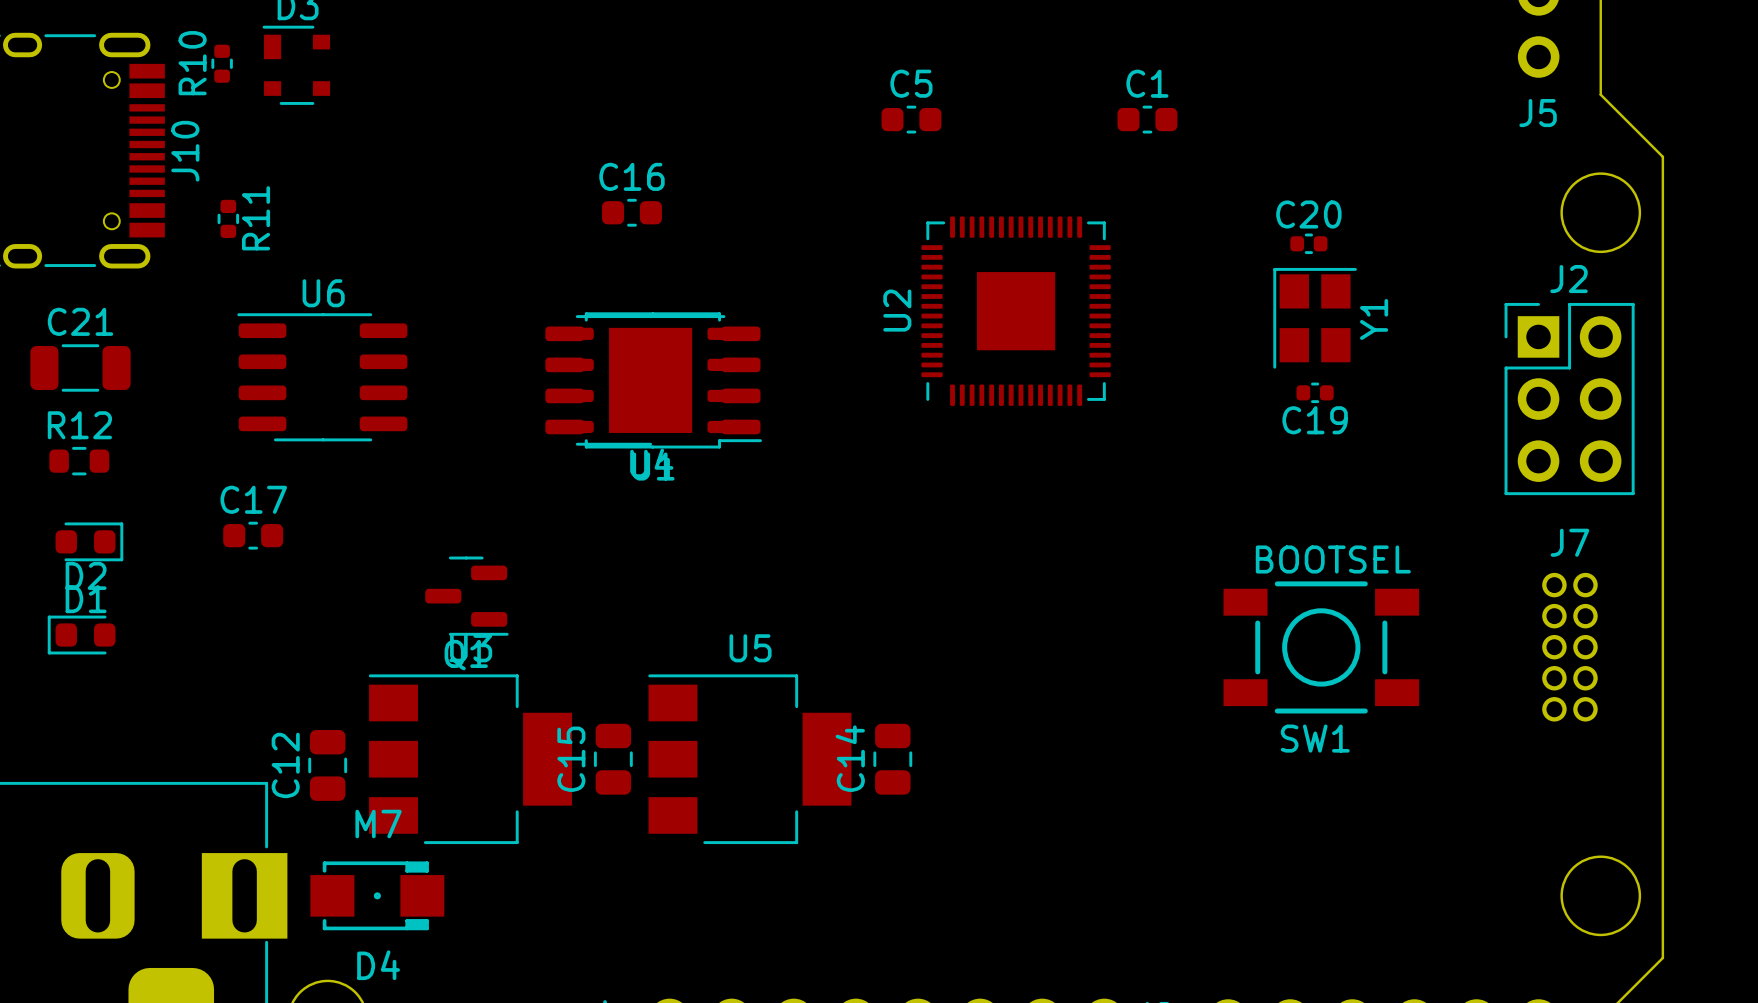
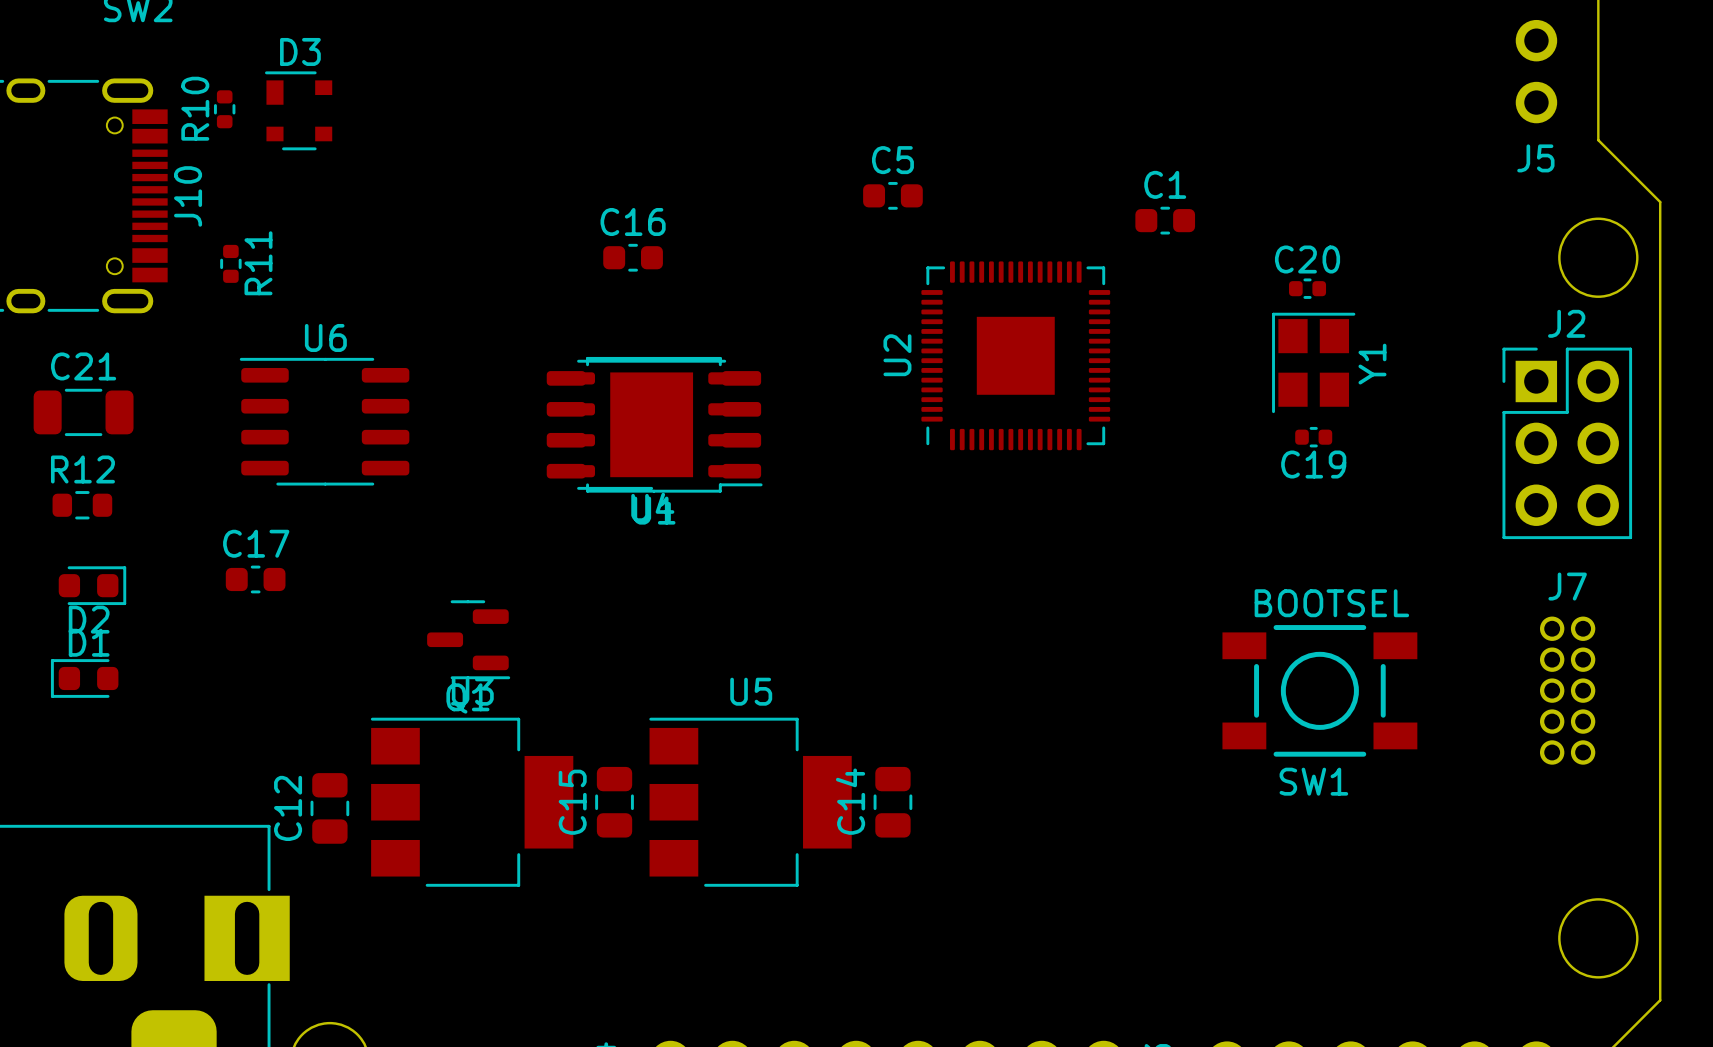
C5 position: (911, 119) -> (892, 195)
C1 position: (1147, 119) -> (1165, 220)
D4: M7 (377, 895) -> none

